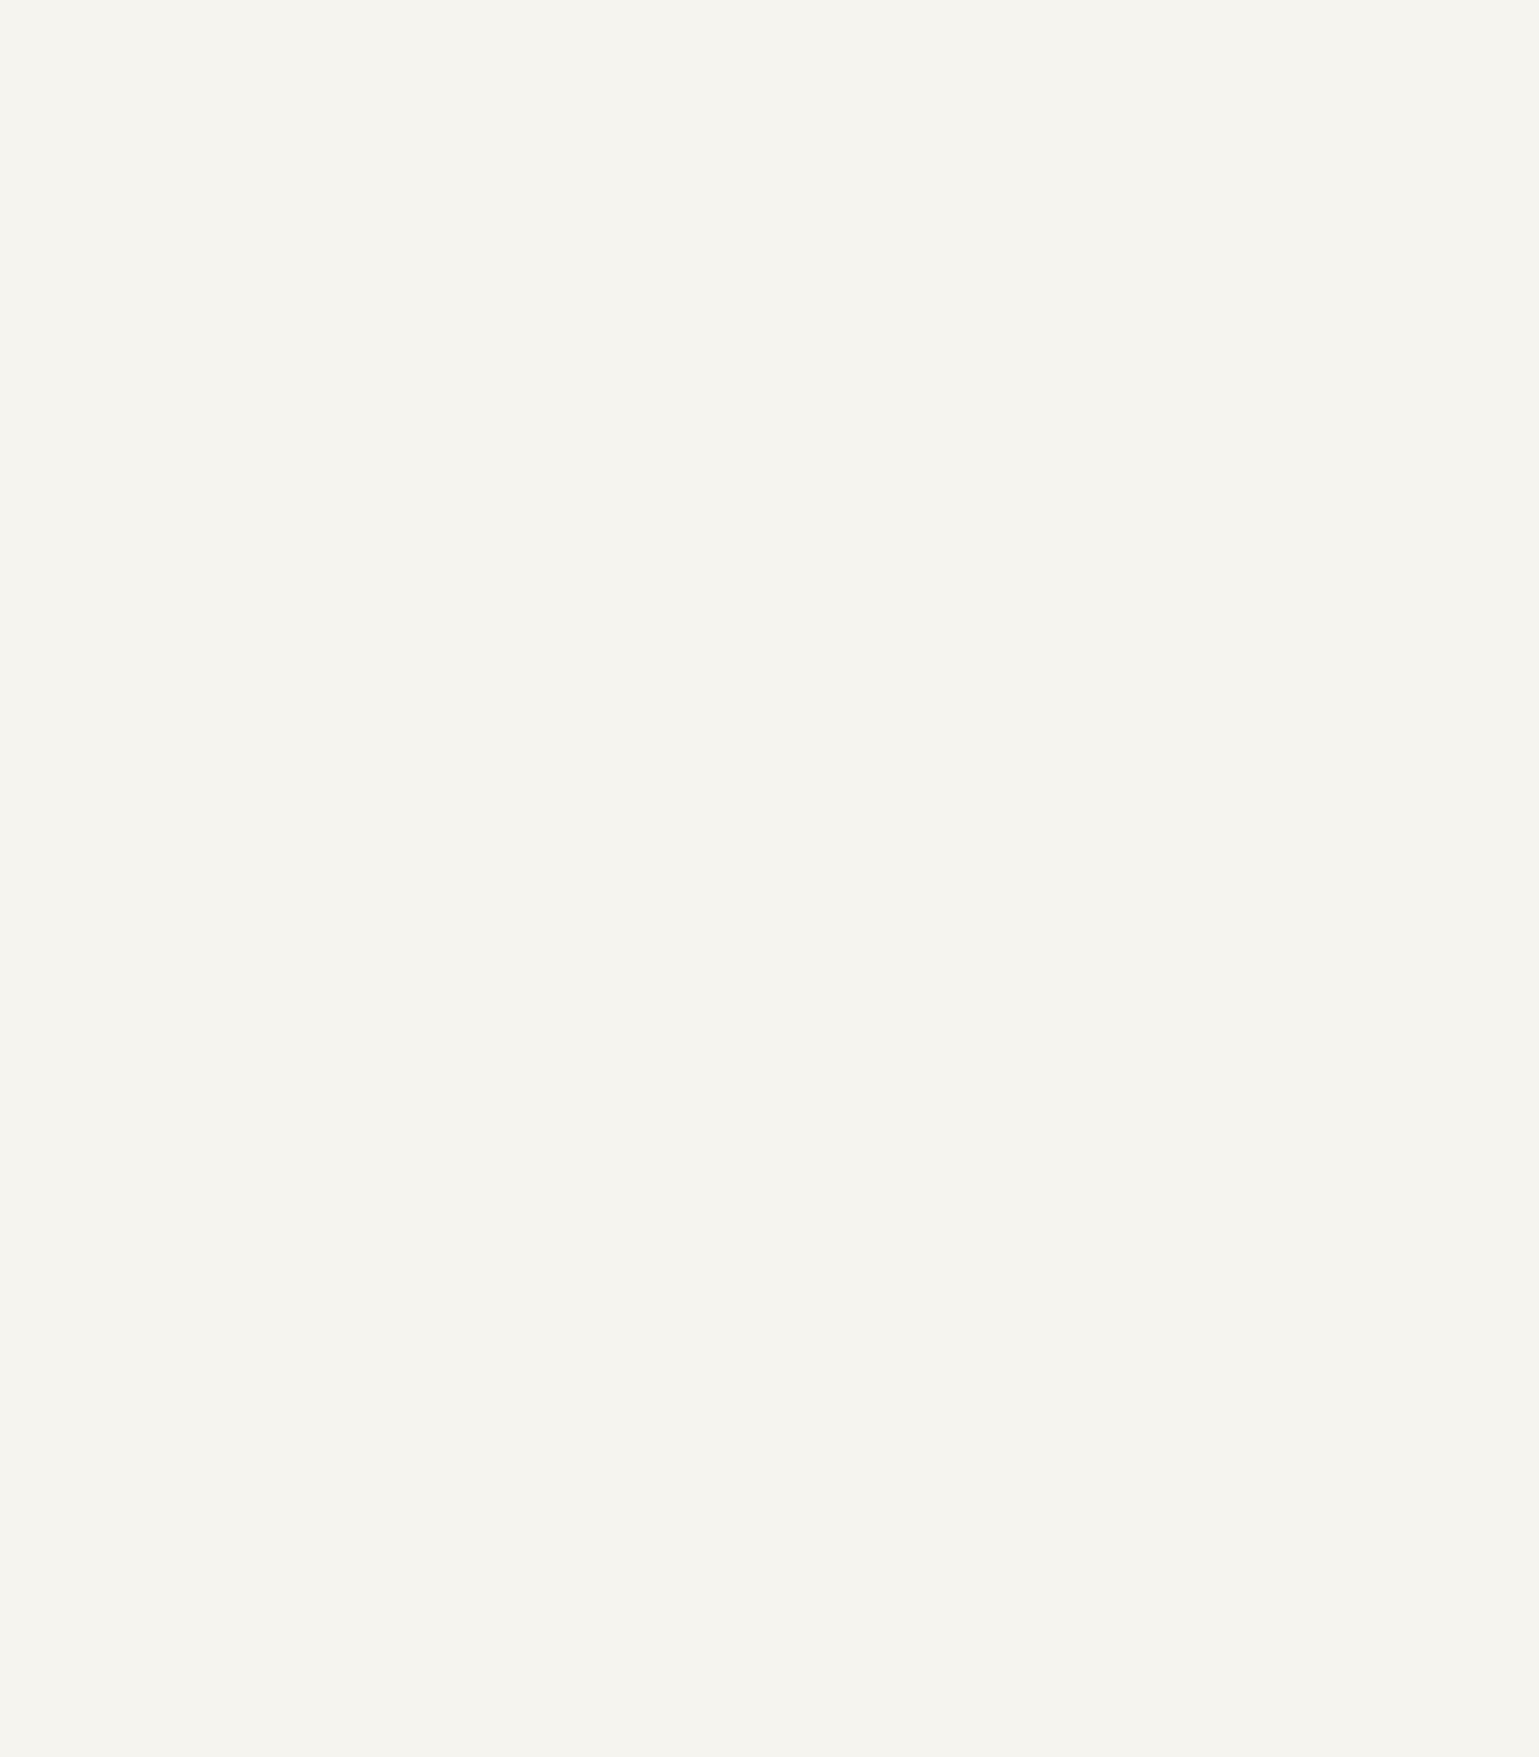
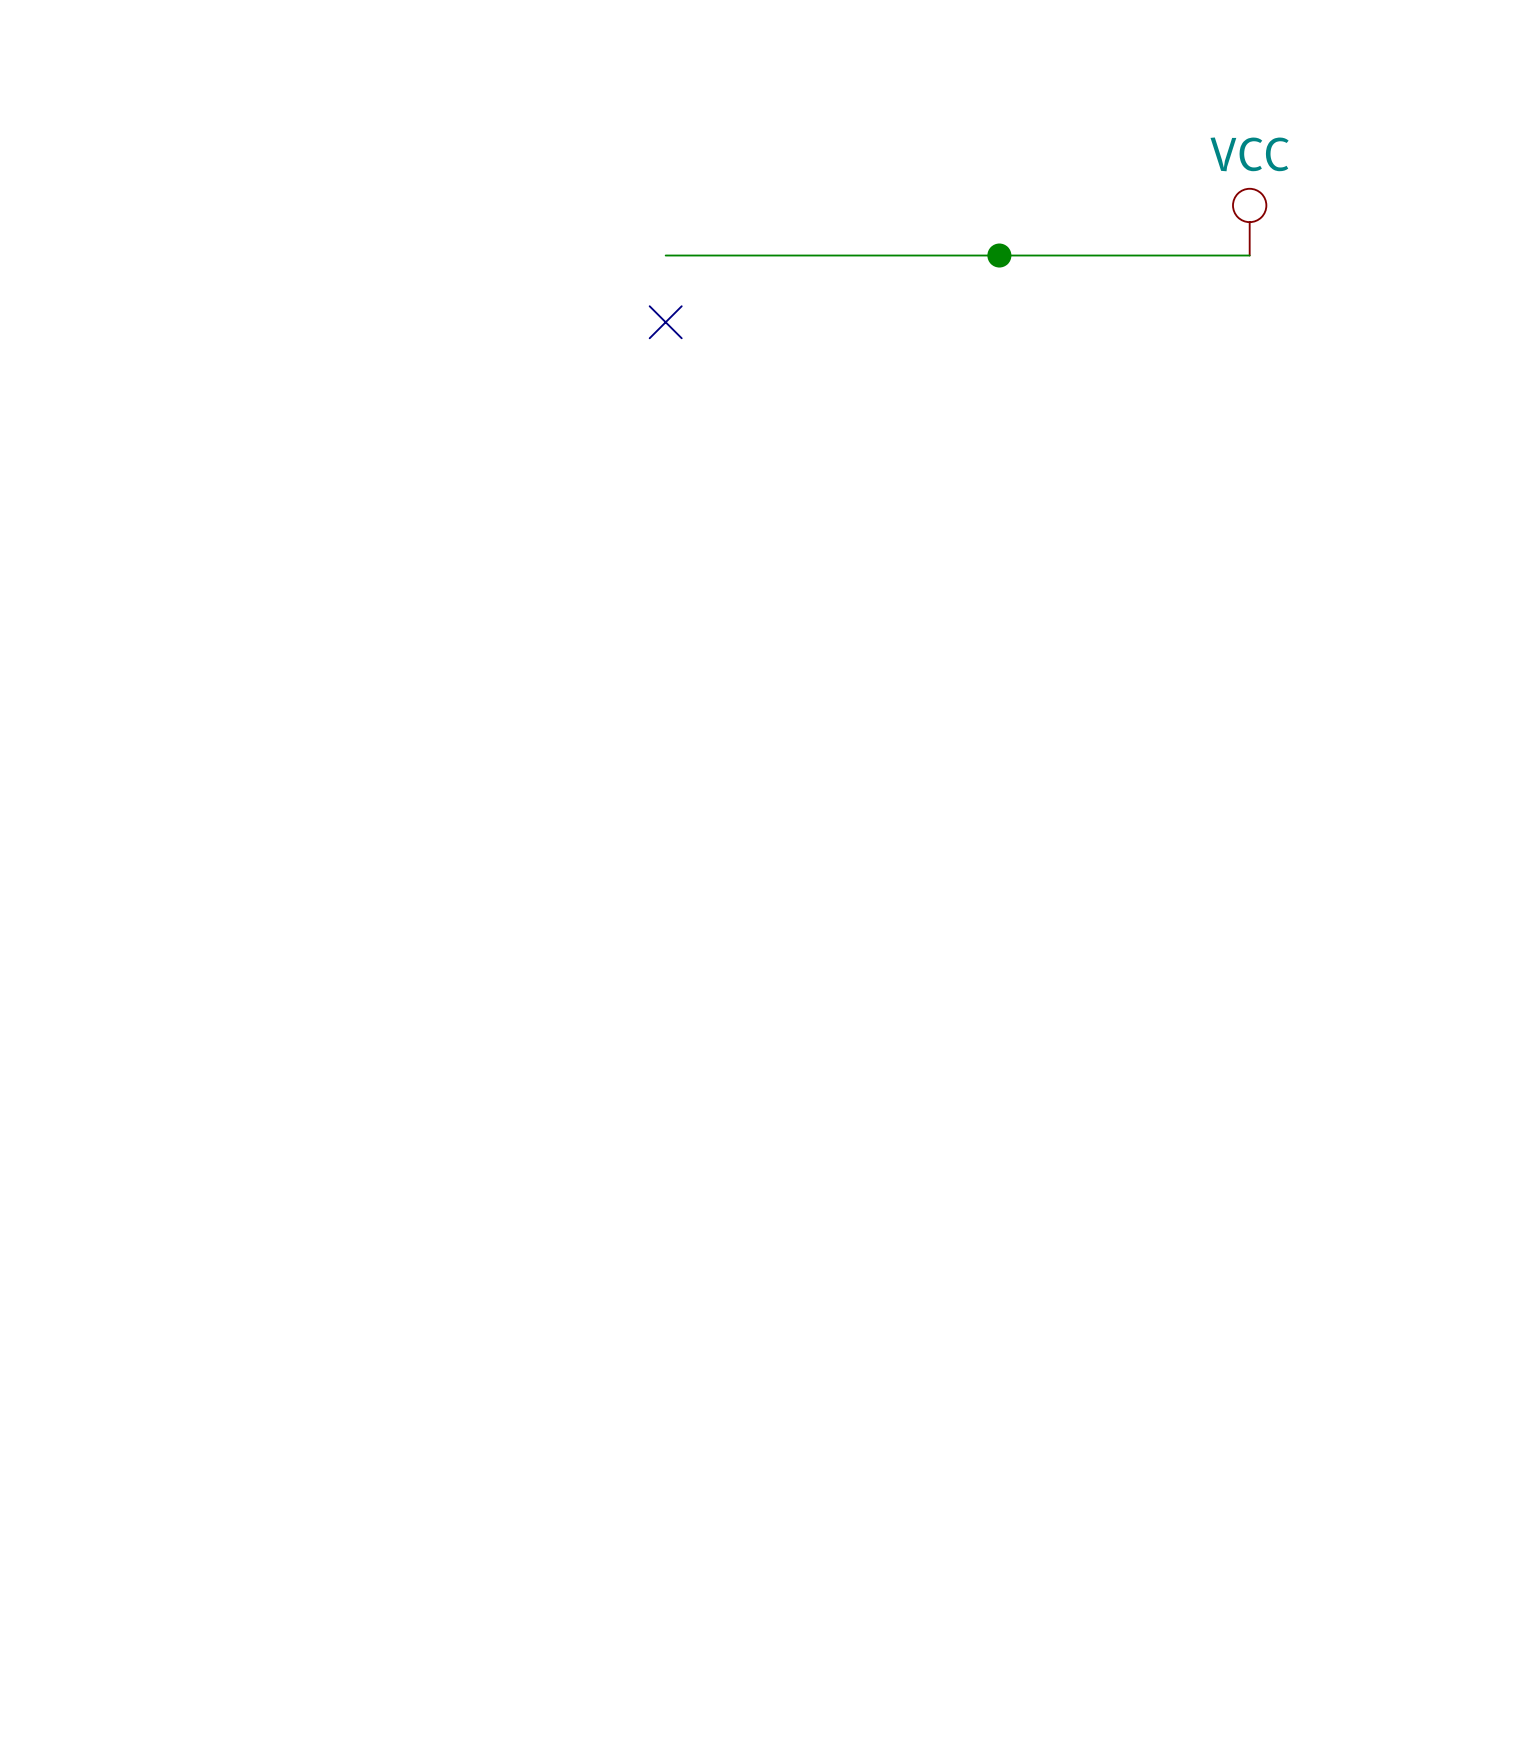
power symbol: none -> VCC (1249, 222)
wire: none -> (665, 255) (1249, 255)
junction: none -> (999, 255)
no-connect mark: none -> (665, 322)

